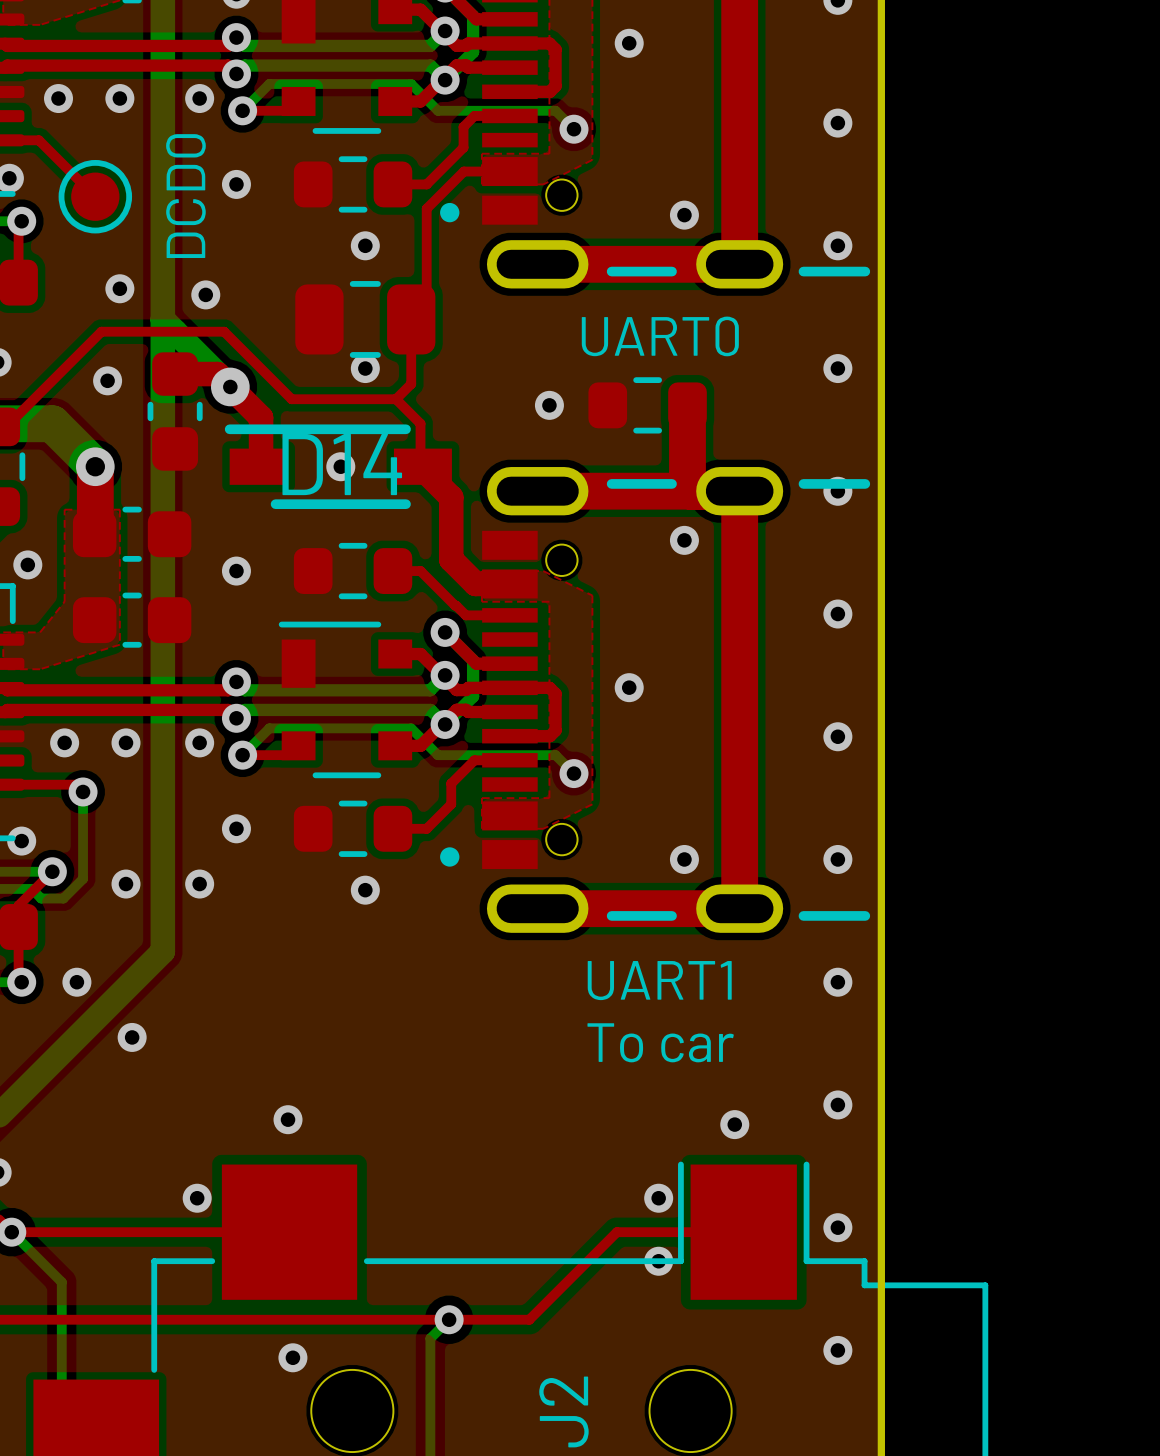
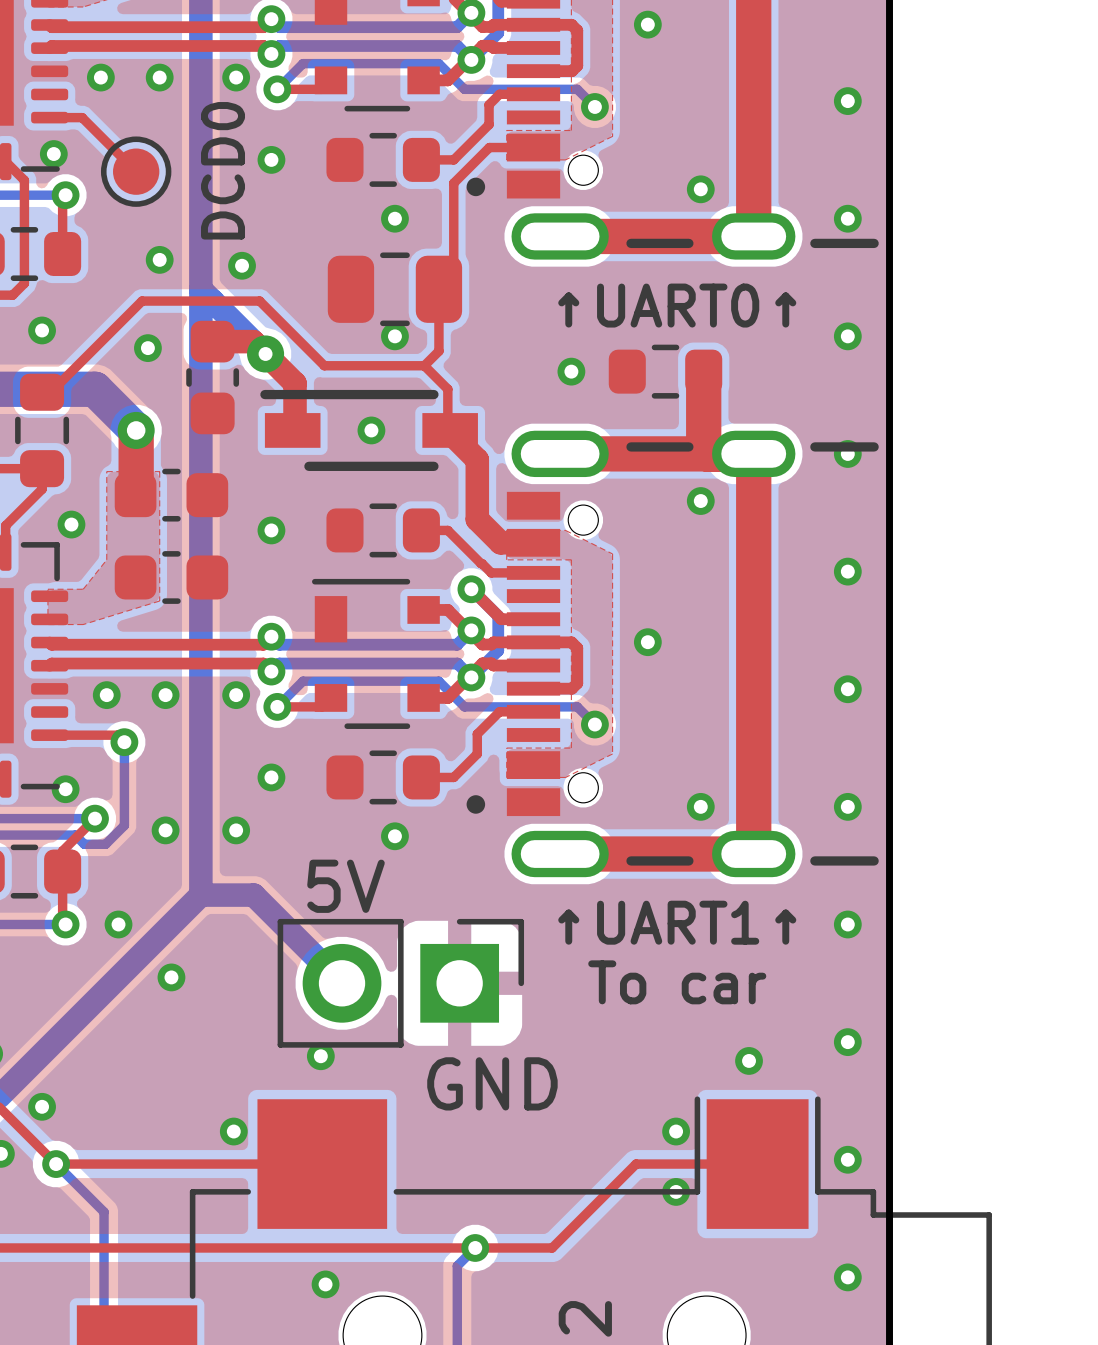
text: UART0 (660, 336) -> ↑UART0↑ (677, 305)
D14 name: D14 (342, 464) -> none
text: none -> 5V (345, 886)
bottom track: none -> (200, 895) (253, 895) (342, 983)
text: UART1 (659, 980) -> ↑UART1↑ (677, 922)
part: none -> (400, 983)
text: none -> GND (492, 1083)

